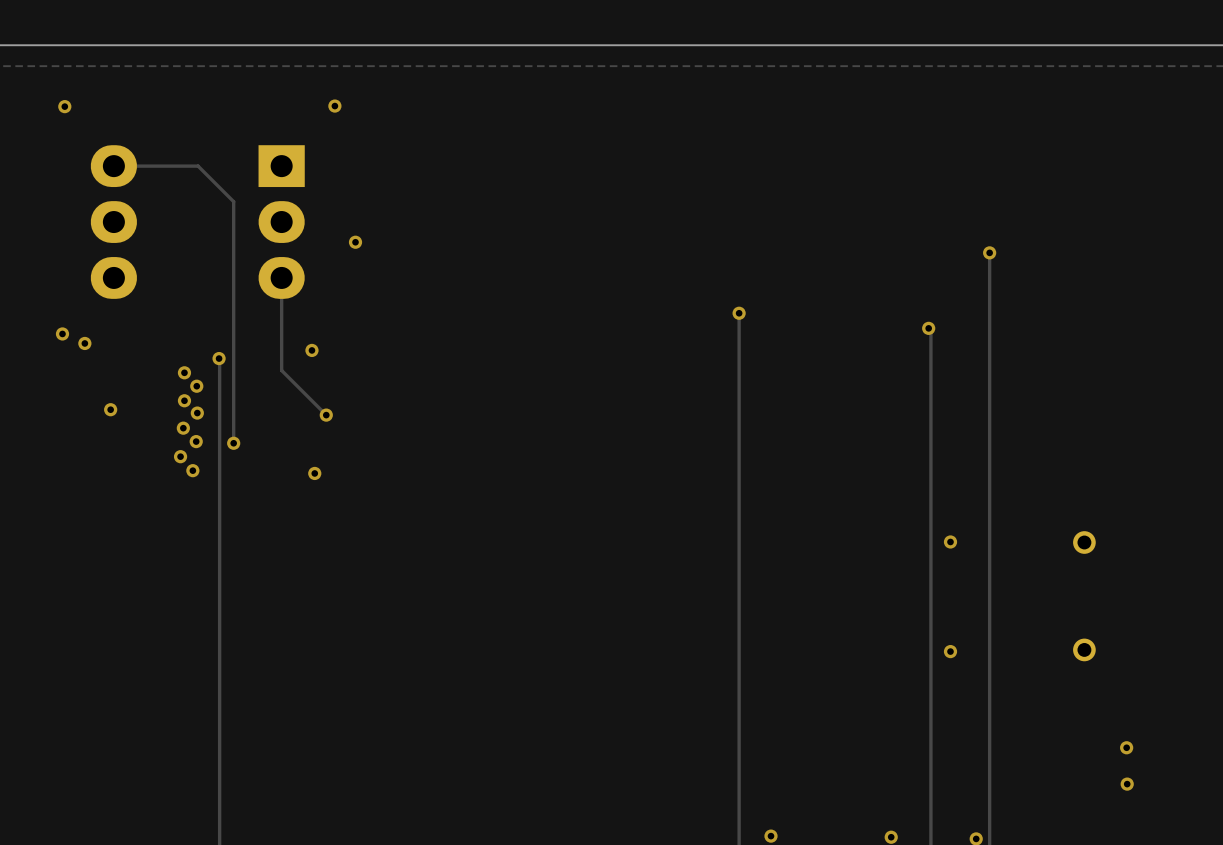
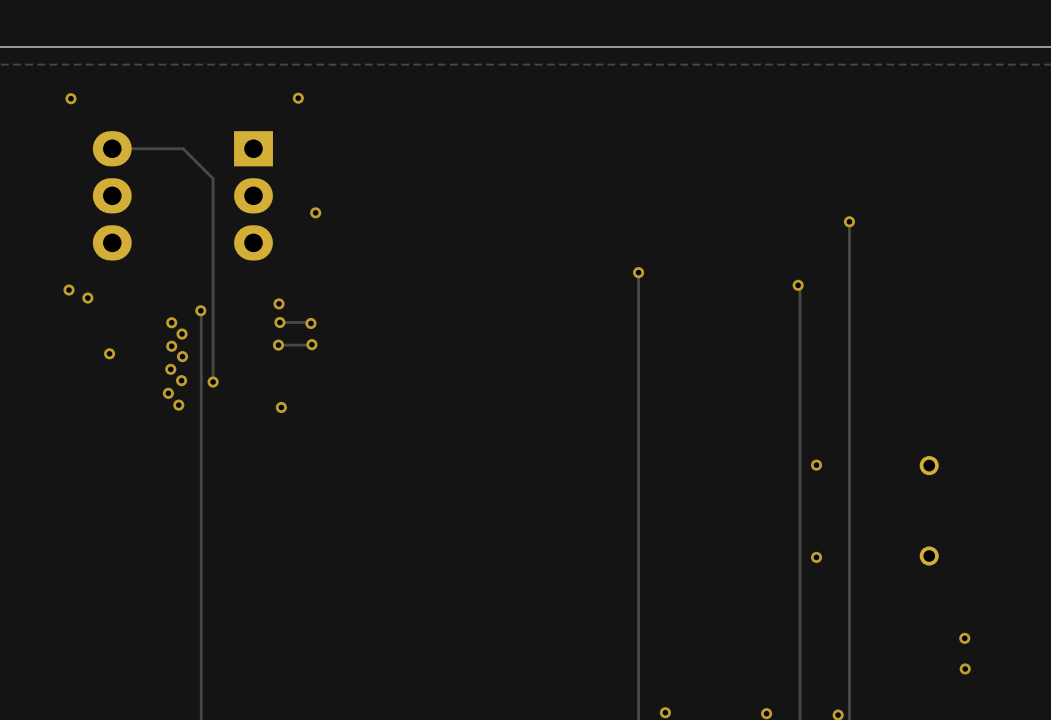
track: (281, 277) (281, 370) (326, 415) -> none
track: none -> (279, 322) (310, 323)
via: none -> (279, 322)
via: none -> (310, 323)
track: none -> (311, 344) (278, 345)
via: none -> (311, 344)
via: none -> (278, 345)
via: (326, 415) -> none

